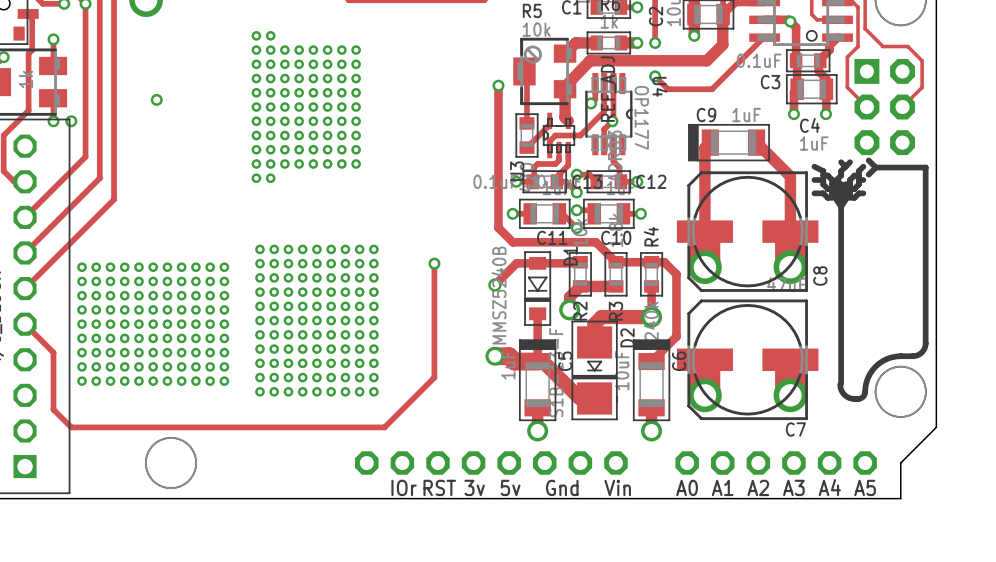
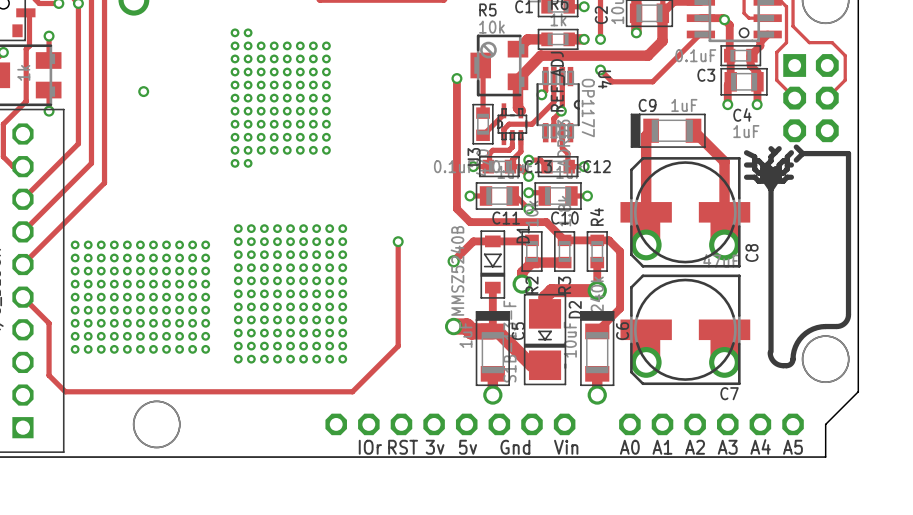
via: (71, 121) -> none

